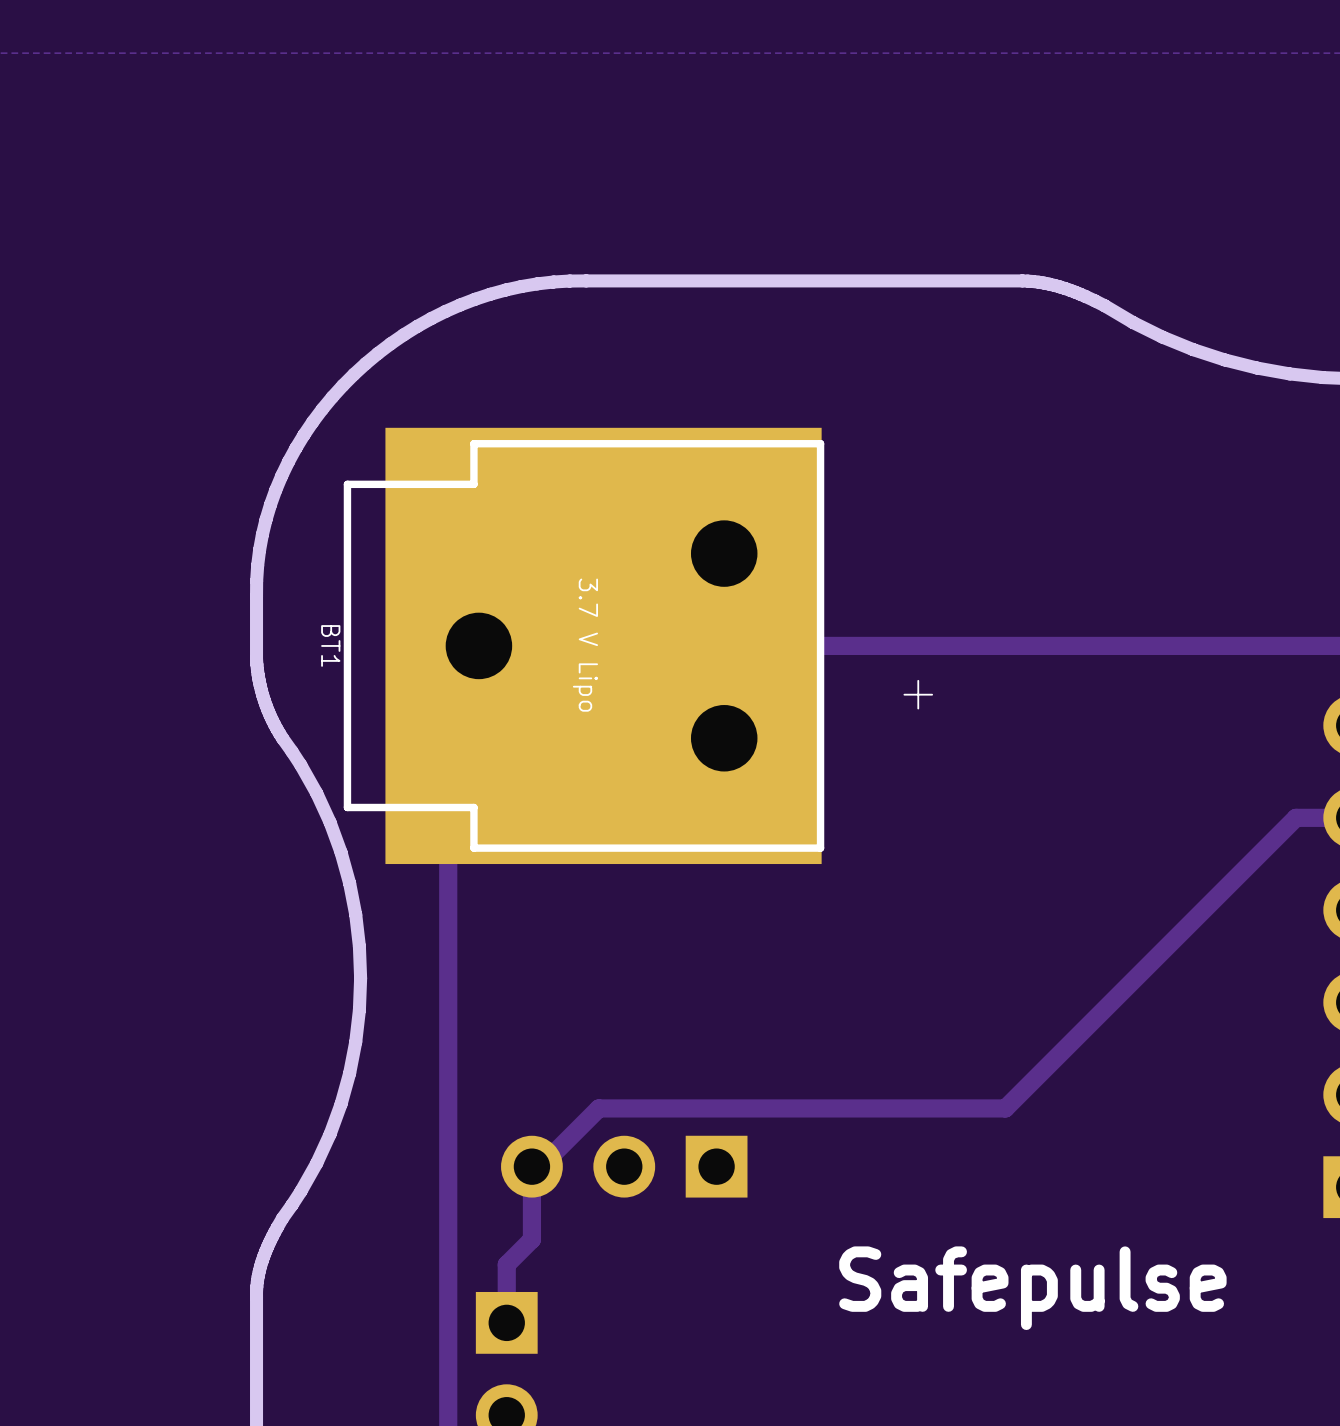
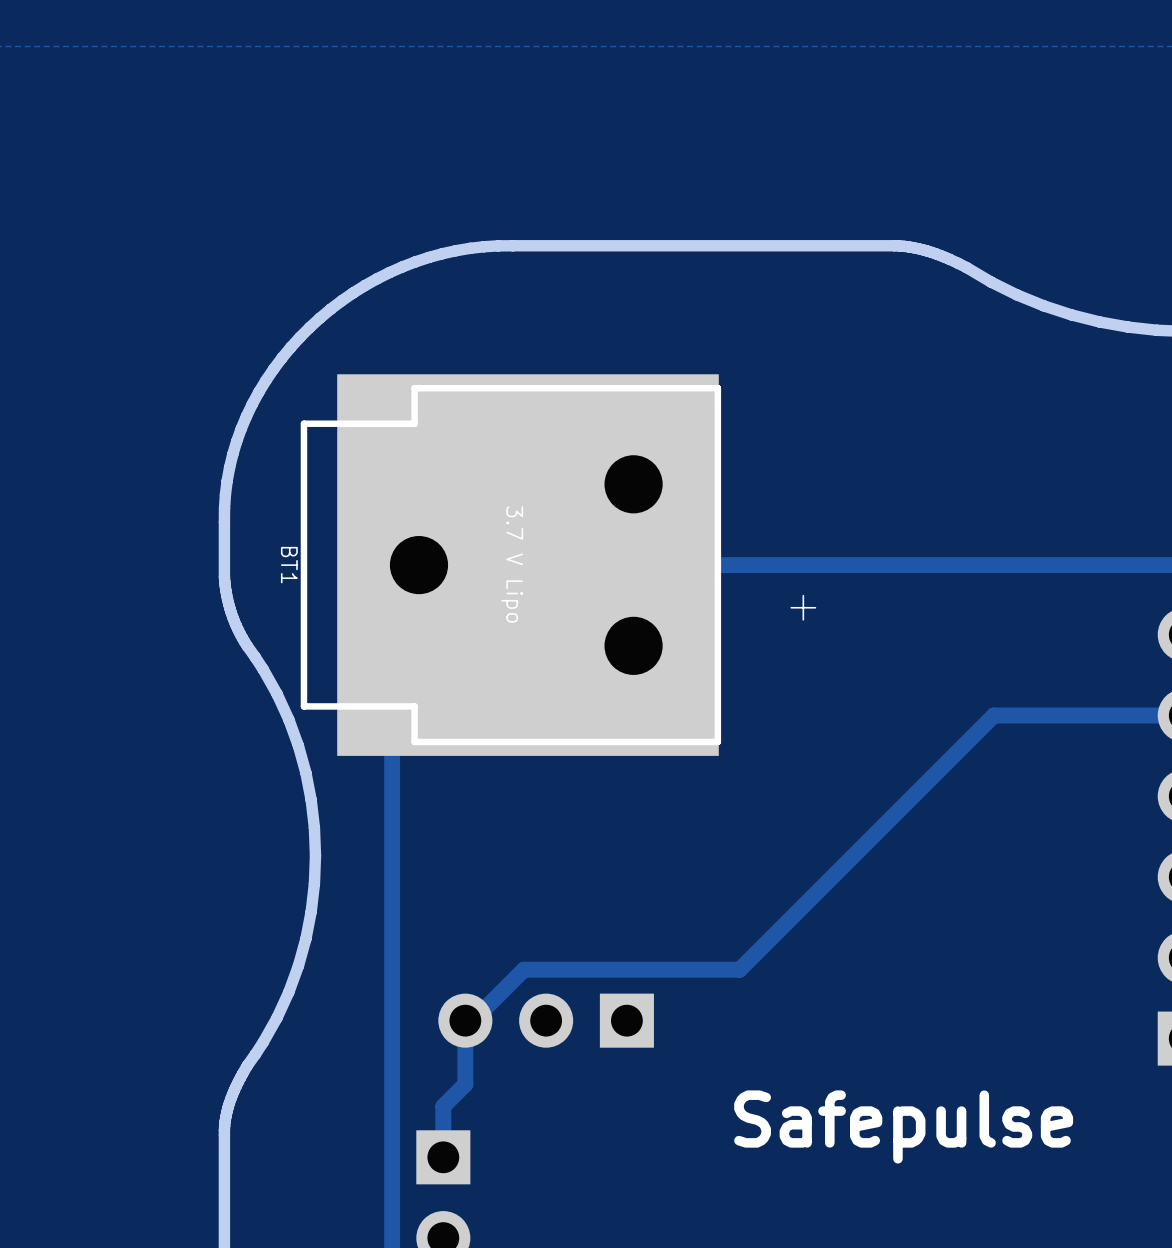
track: (1296, 817) (1005, 1108) (845, 1108) -> (1133, 715) (993, 715) (739, 969)

